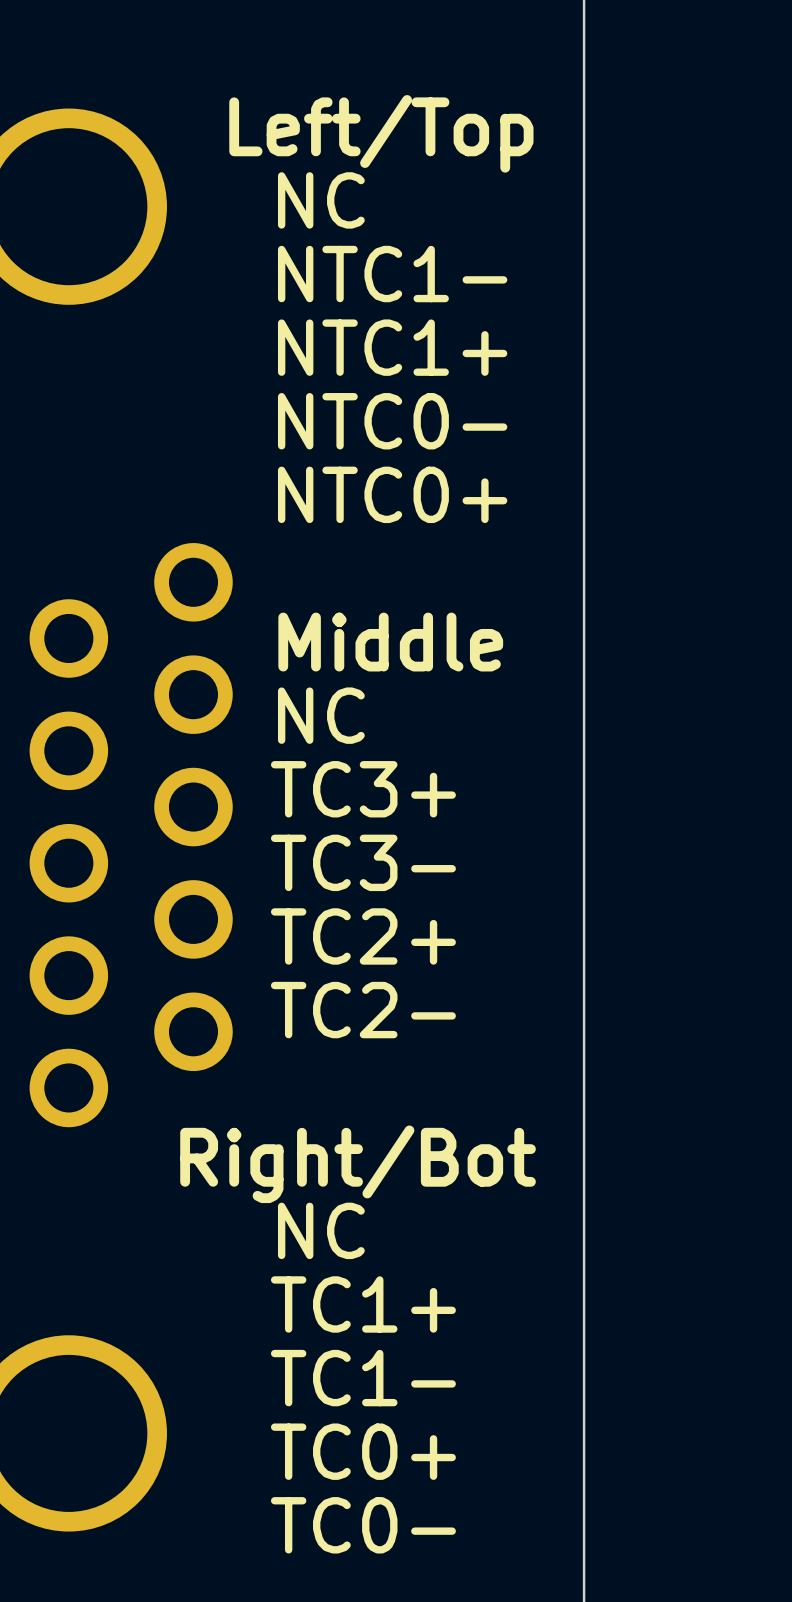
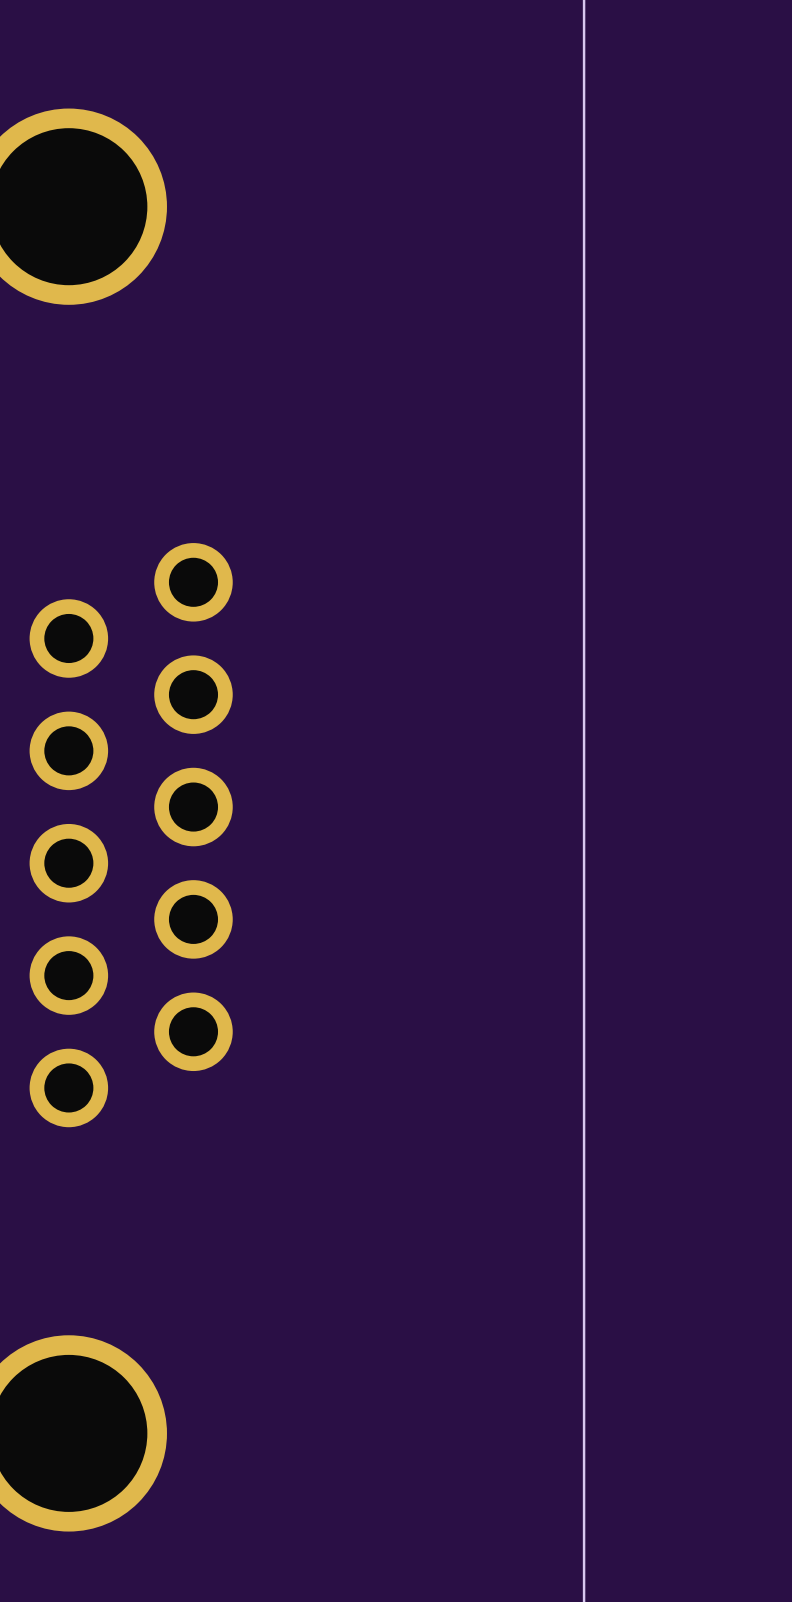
text: Left/Top (381, 133) -> none
text: NC (321, 200) -> none
text: NTC1- (392, 274) -> none
text: NTC1+ (392, 347) -> none
text: NTC0- (392, 421) -> none
text: NTC0+ (392, 494) -> none
text: Middle (390, 642) -> none
text: NC (321, 715) -> none
text: TC3+ (363, 789) -> none
text: TC3- (363, 862) -> none
text: TC2+ (363, 936) -> none
text: TC2- (363, 1010) -> none
text: Right/Bot (358, 1164) -> none
text: NC (321, 1230) -> none
text: TC1+ (363, 1304) -> none
text: TC1- (363, 1378) -> none
text: TC0+ (363, 1451) -> none
text: TC0- (363, 1525) -> none

